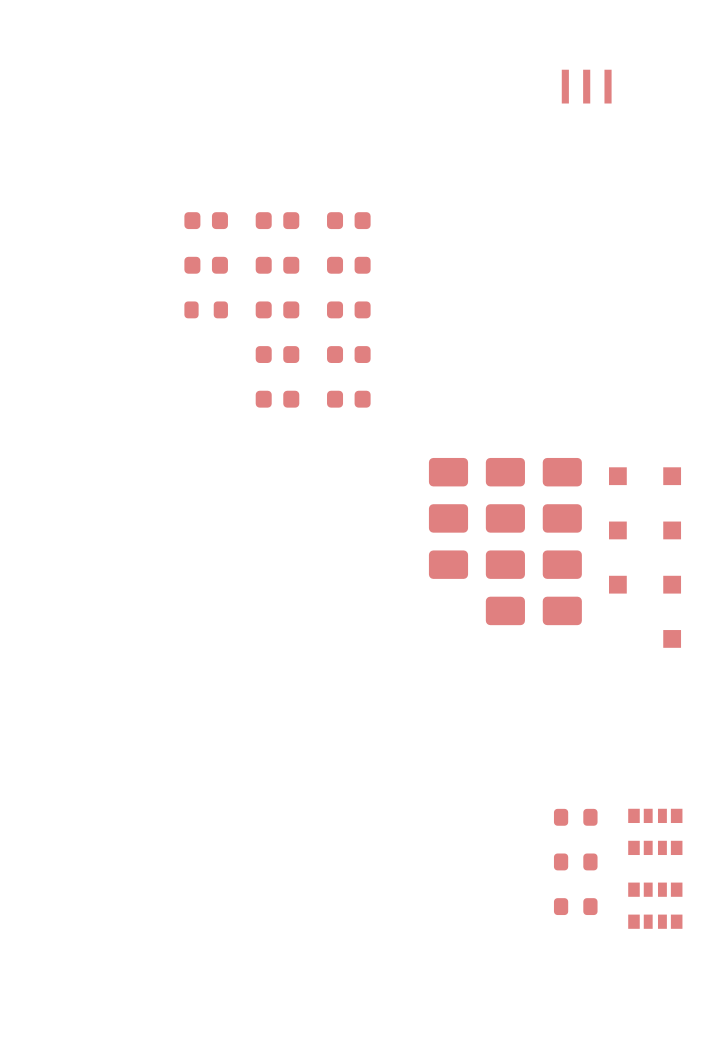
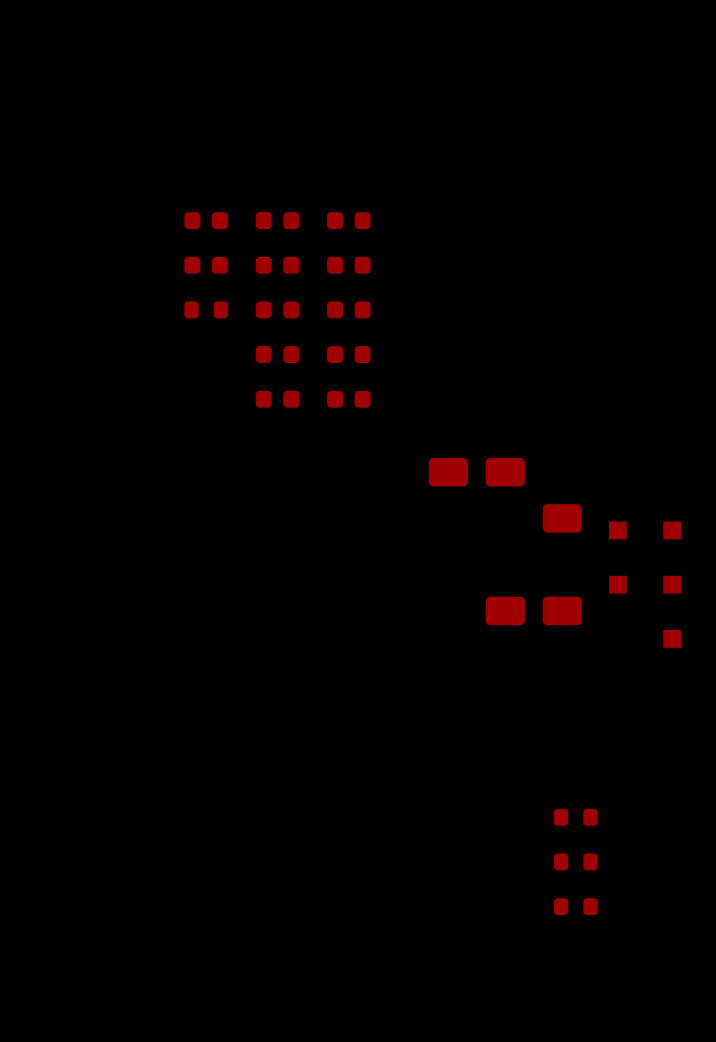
part: (586, 86) -> none
part: (562, 472) -> none
part: (617, 476) -> none
part: (672, 476) -> none
part: (448, 518) -> none
part: (505, 518) -> none
part: (448, 564) -> none
part: (505, 564) -> none
part: (562, 564) -> none
part: (655, 831) -> none
part: (655, 905) -> none

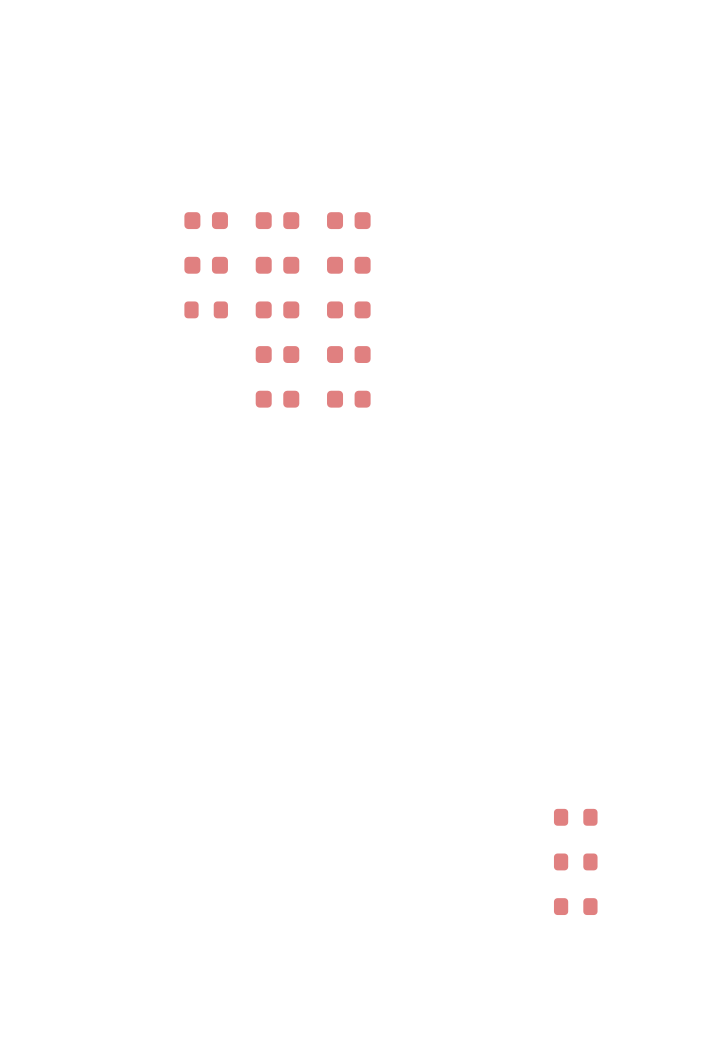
part: (448, 472) -> none
part: (505, 472) -> none
part: (562, 518) -> none
part: (617, 530) -> none
part: (672, 530) -> none
part: (617, 584) -> none
part: (672, 584) -> none
part: (505, 610) -> none
part: (562, 610) -> none
part: (672, 638) -> none

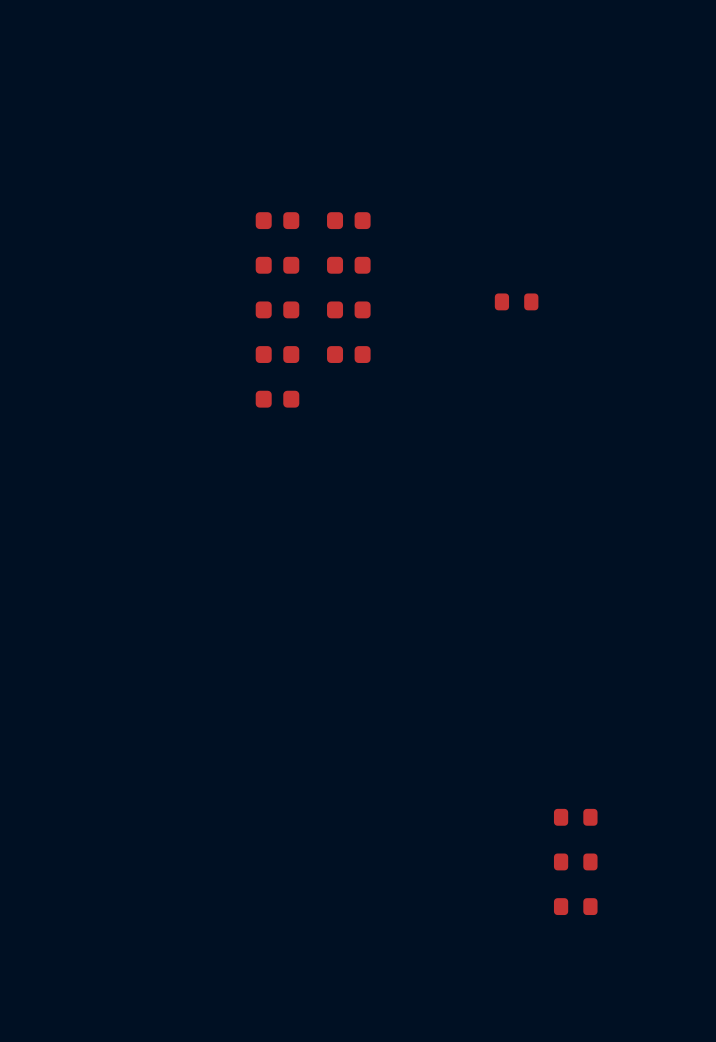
part: (206, 220) -> none
part: (206, 265) -> none
part position: (206, 309) -> (516, 301)
part: (348, 399) -> none

